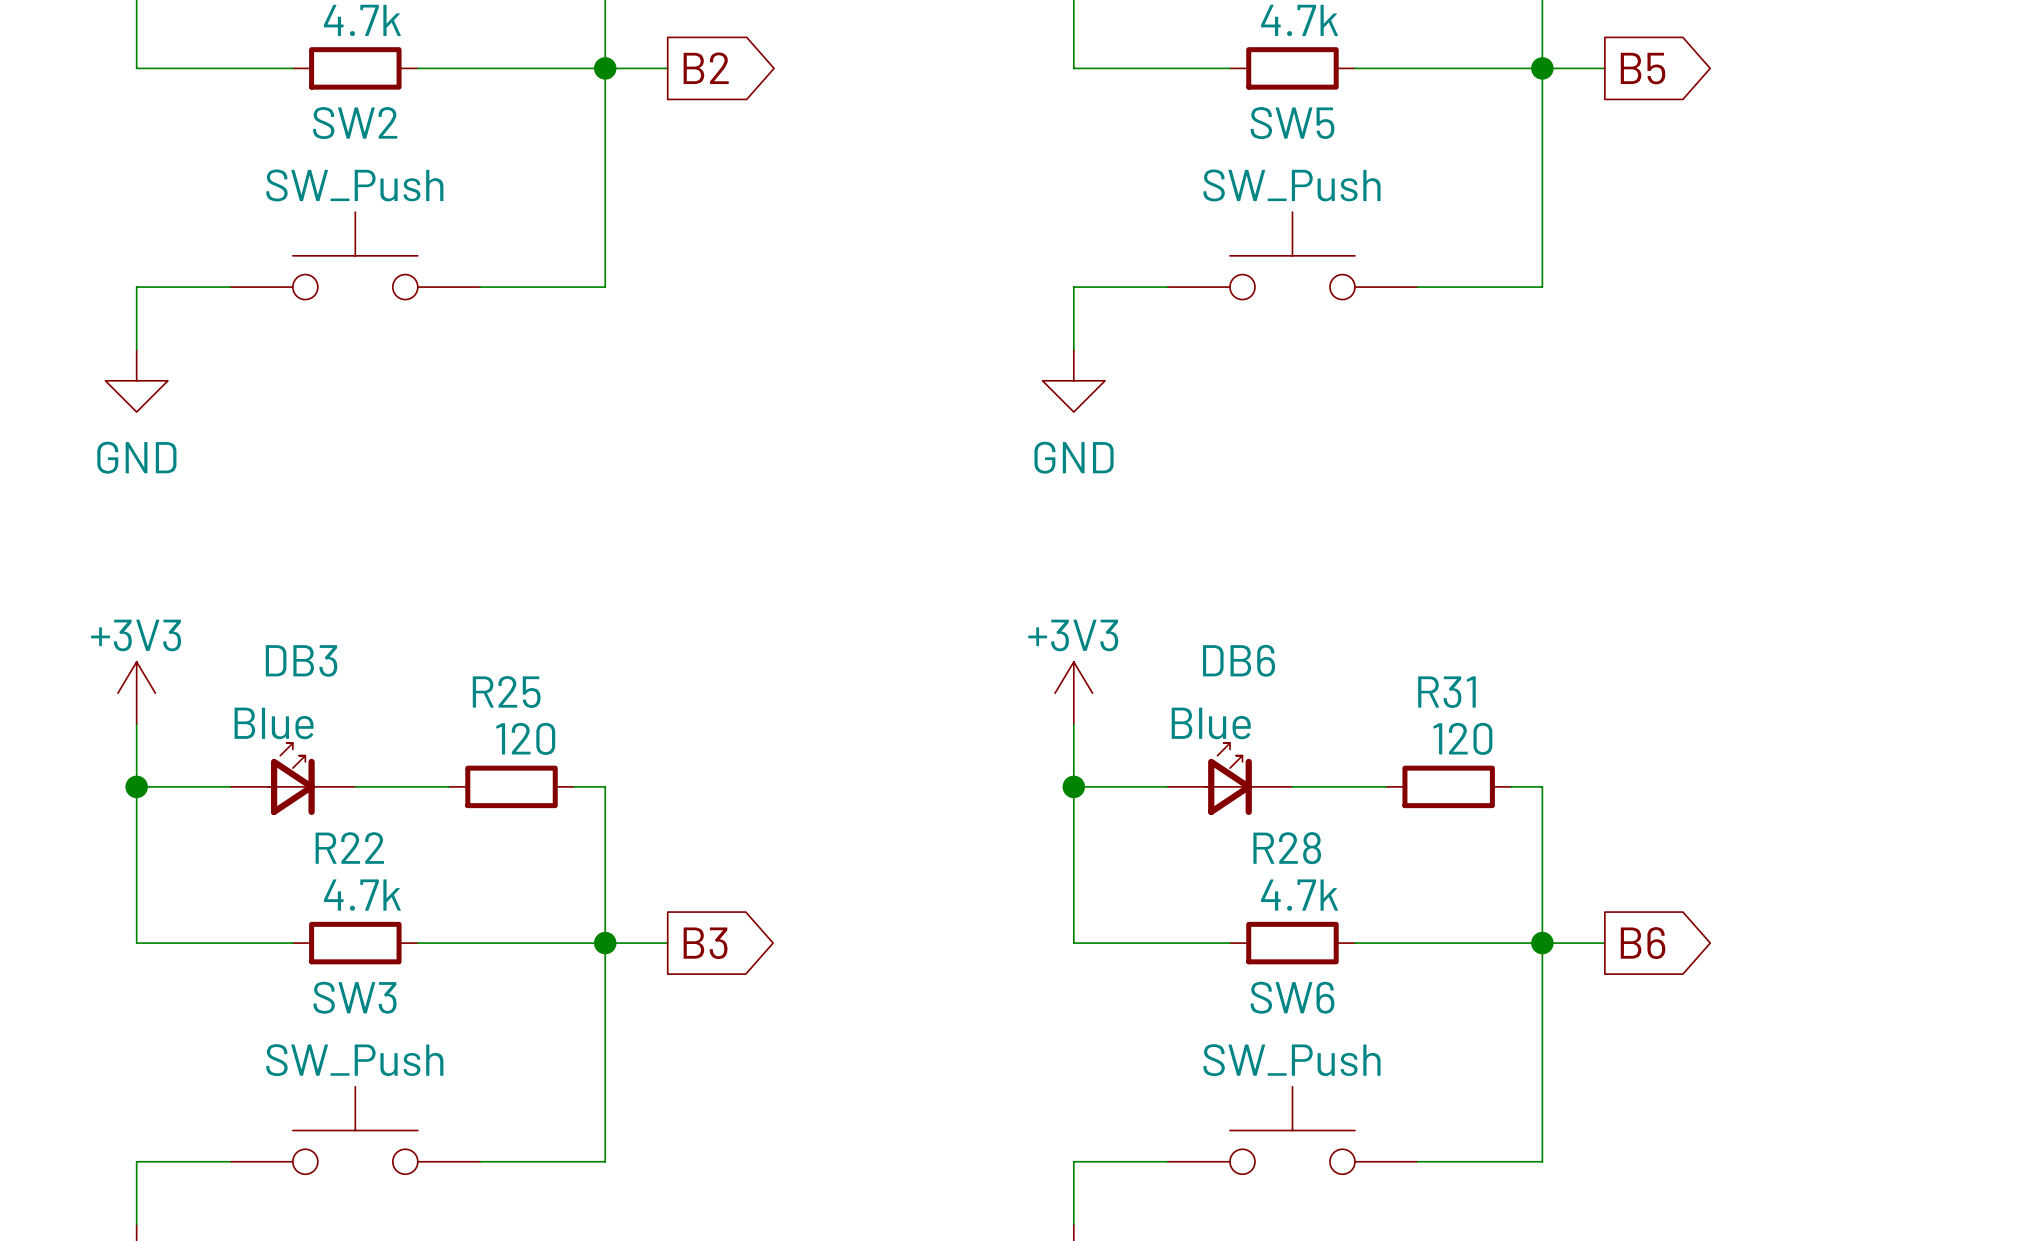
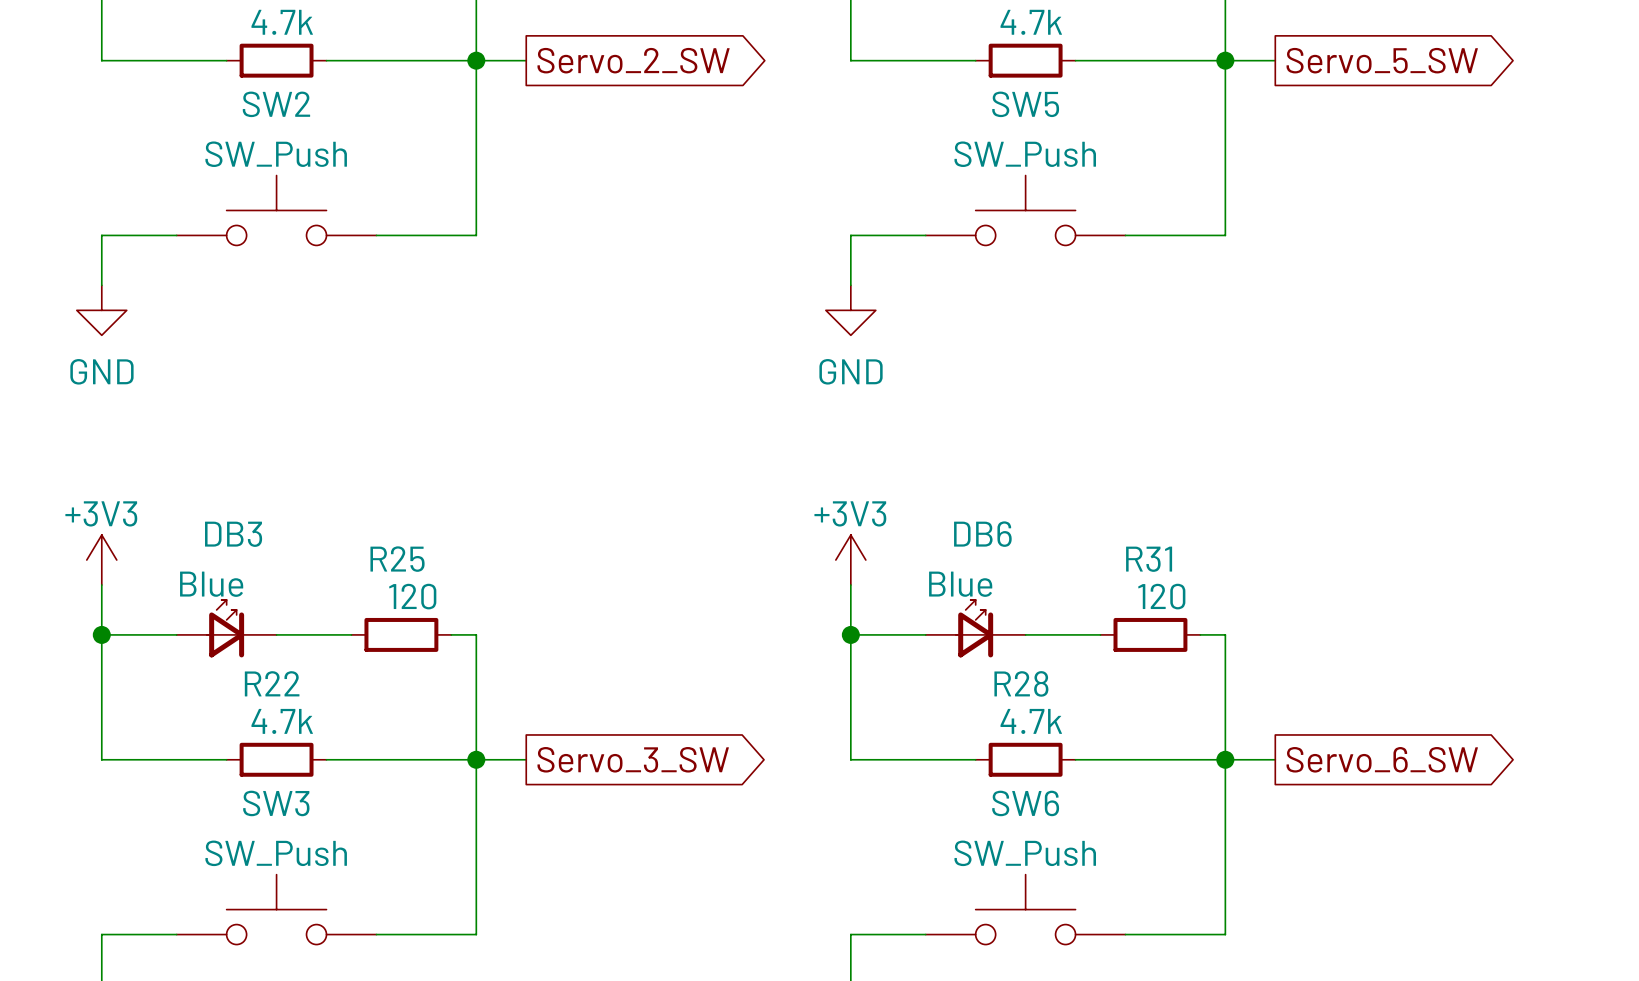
global label: B2 (706, 68) -> Servo_2_SW (633, 60)
global label: B5 (1643, 68) -> Servo_5_SW (1382, 60)
global label: B3 (705, 943) -> Servo_3_SW (633, 759)
global label: B6 (1643, 943) -> Servo_6_SW (1382, 759)

